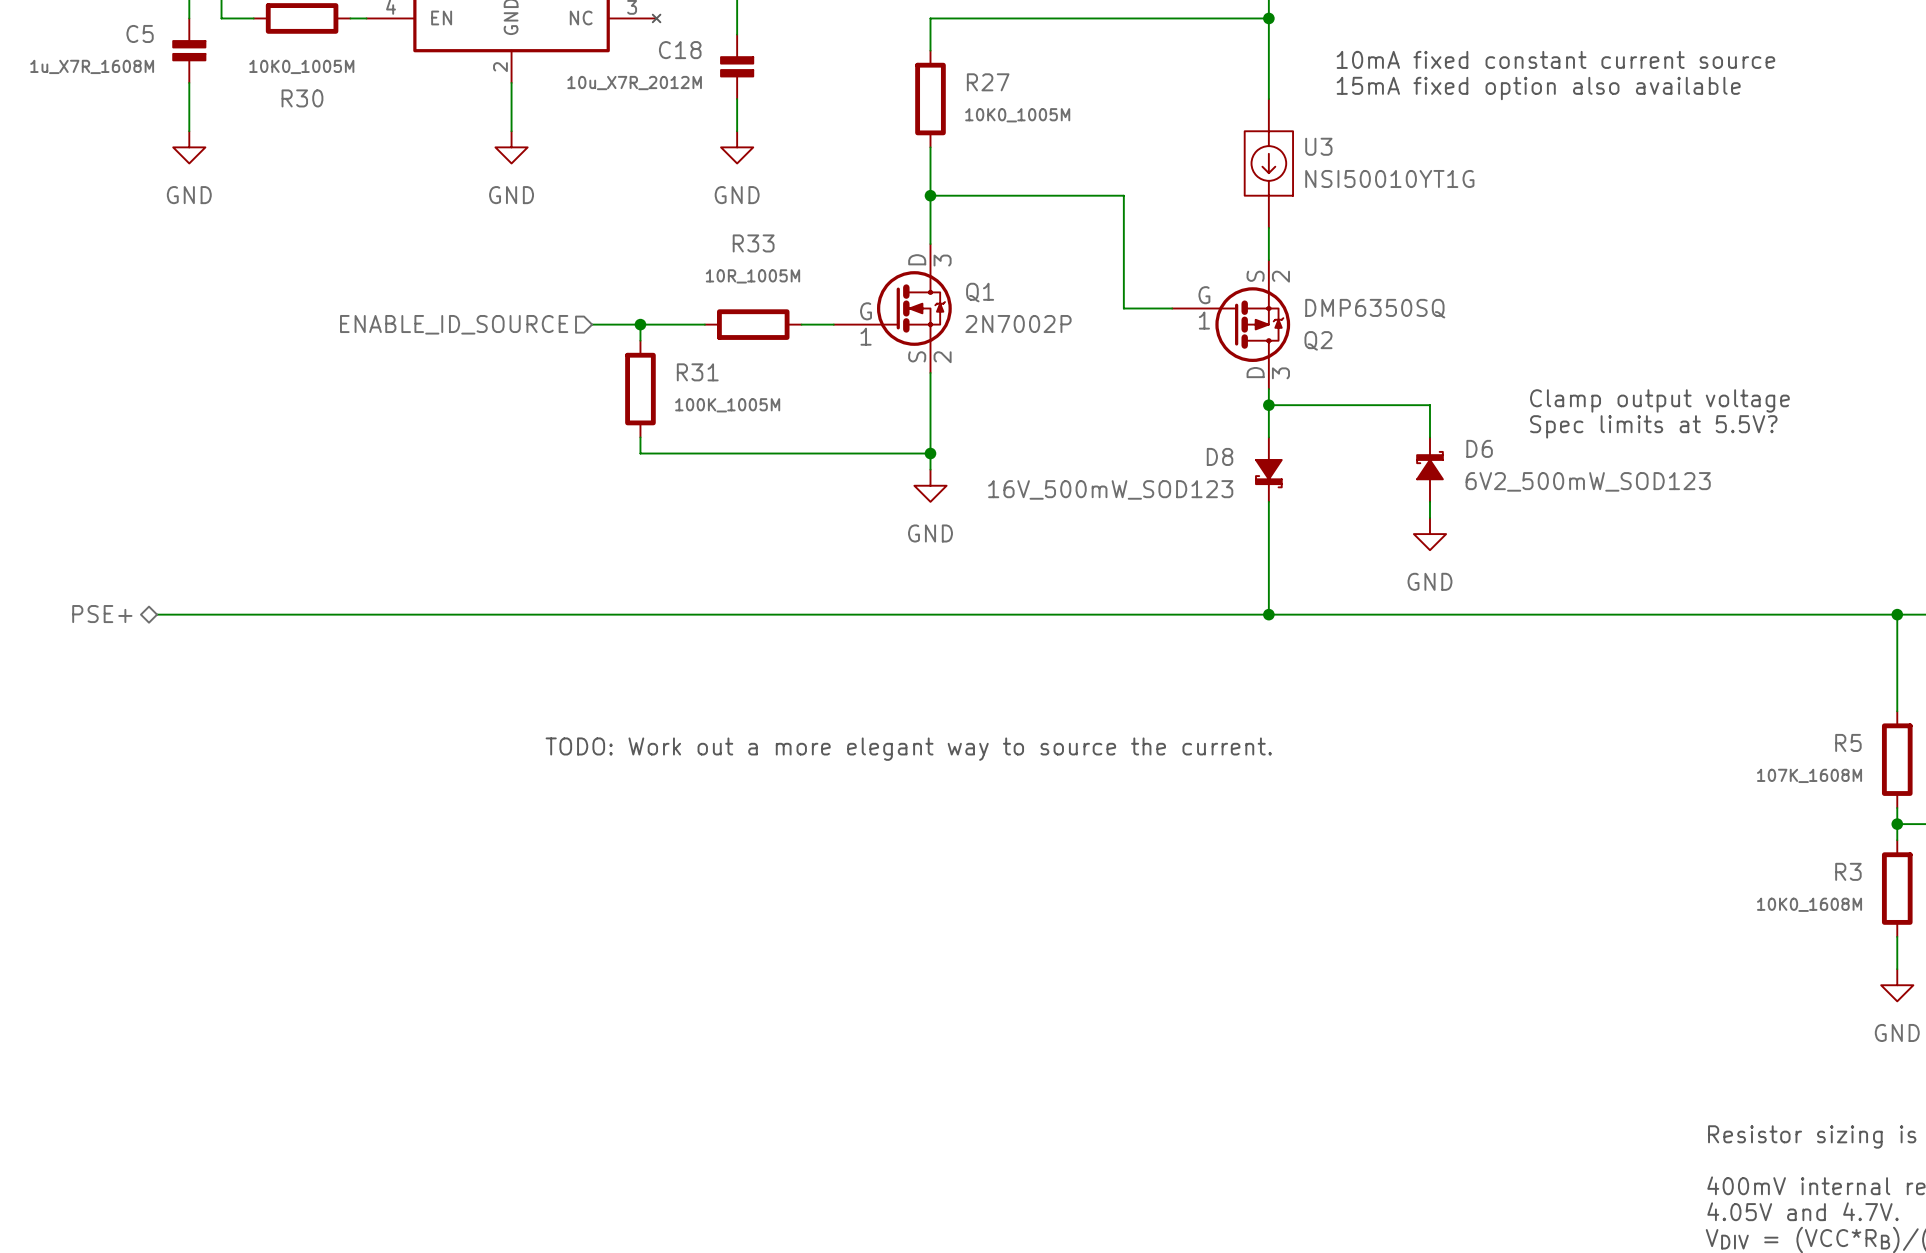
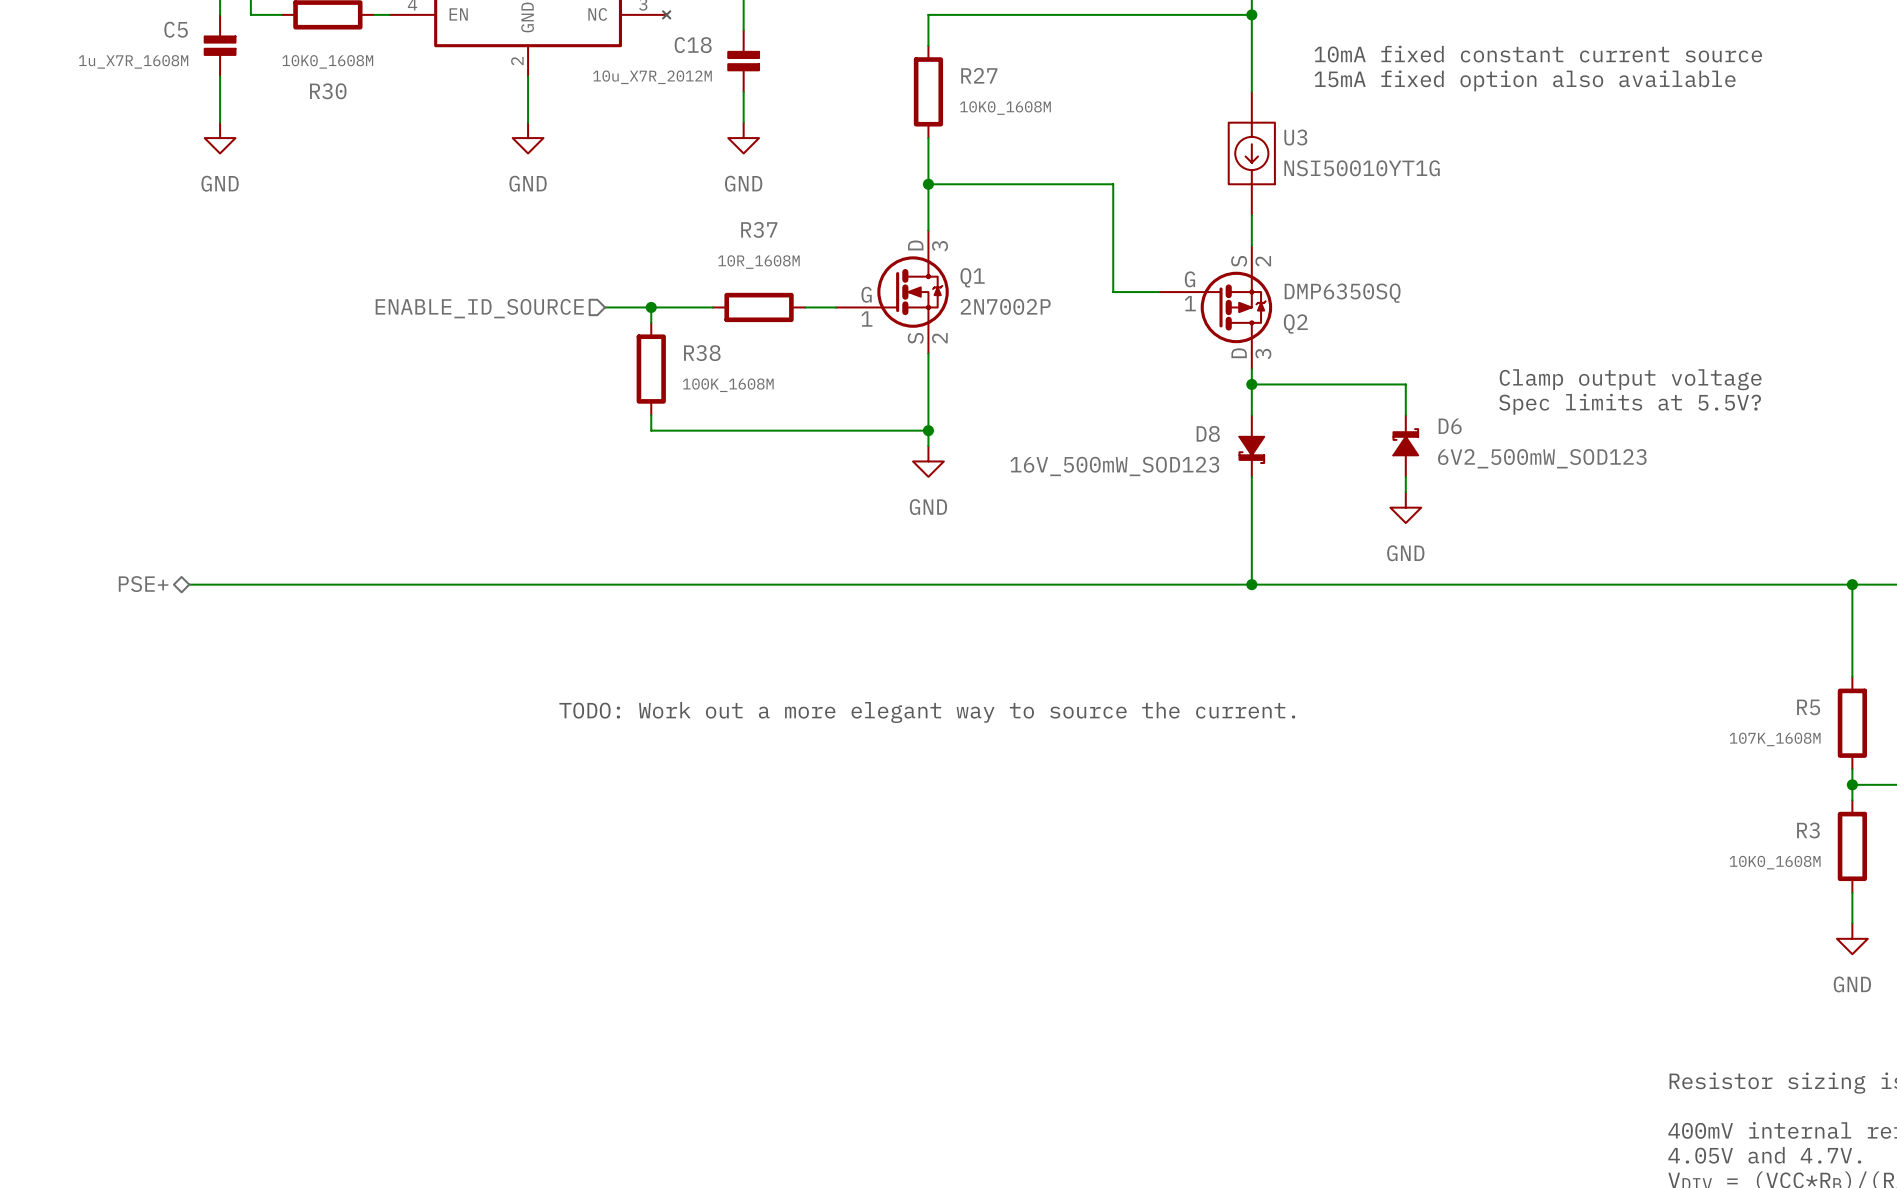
R30 value: 10K0_1005M (301, 66) -> 10K0_1608M (327, 61)
R27 value: 10K0_1005M (1017, 115) -> 10K0_1608M (1005, 108)
R33 name: R33 (753, 243) -> R37 (759, 229)
R33 value: 10R_1005M (752, 276) -> 10R_1608M (758, 262)
R31 name: R31 (697, 372) -> R38 (702, 353)
R31 value: 100K_1005M (727, 405) -> 100K_1608M (728, 385)

